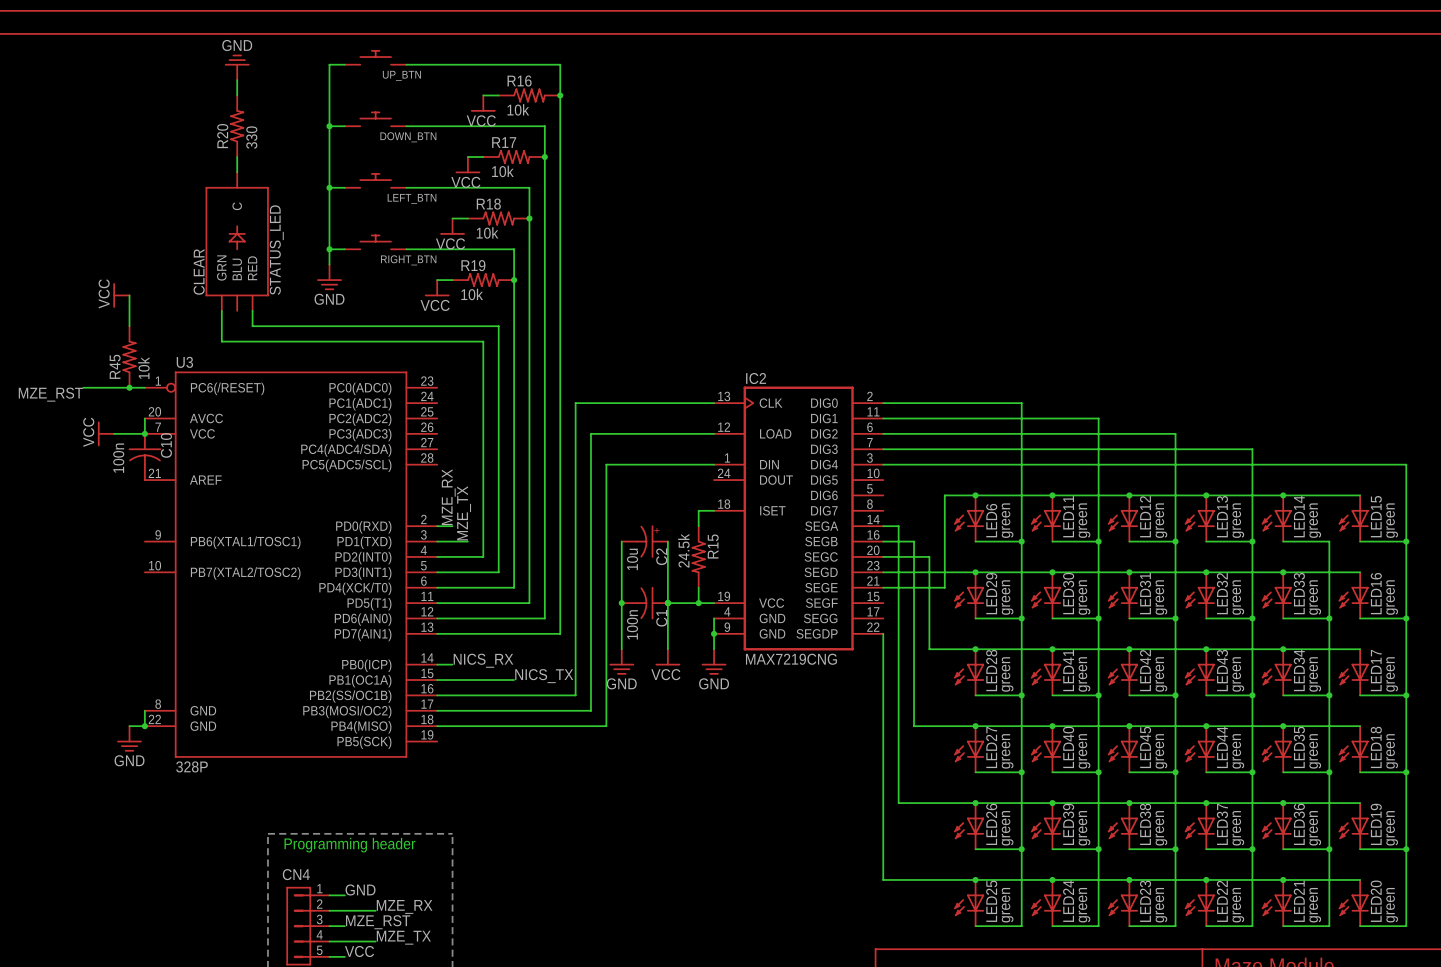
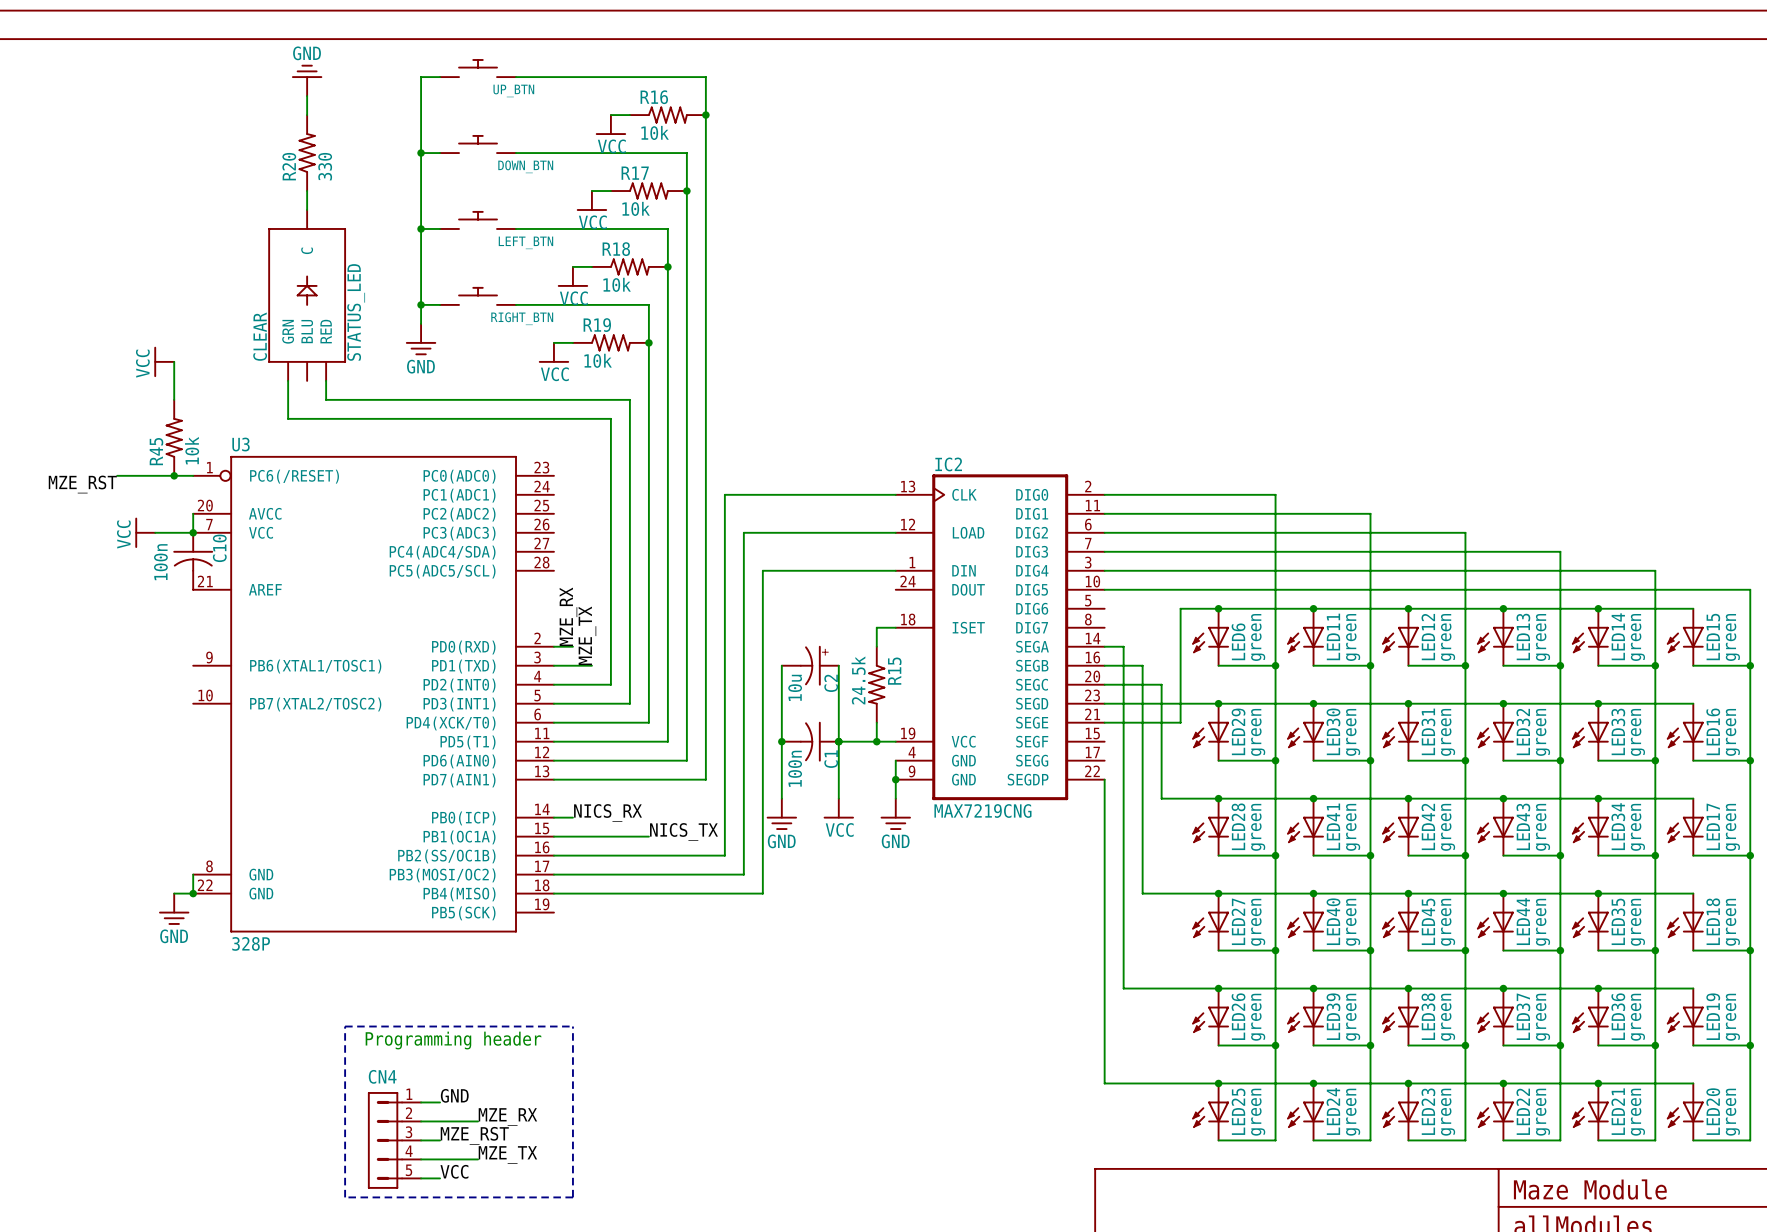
wire: (1329, 464) (1406, 464) (1406, 480) -> (1655, 570) (1655, 665)
wire: none -> (1104, 589) (1750, 589)
junction: none -> (1655, 665)

